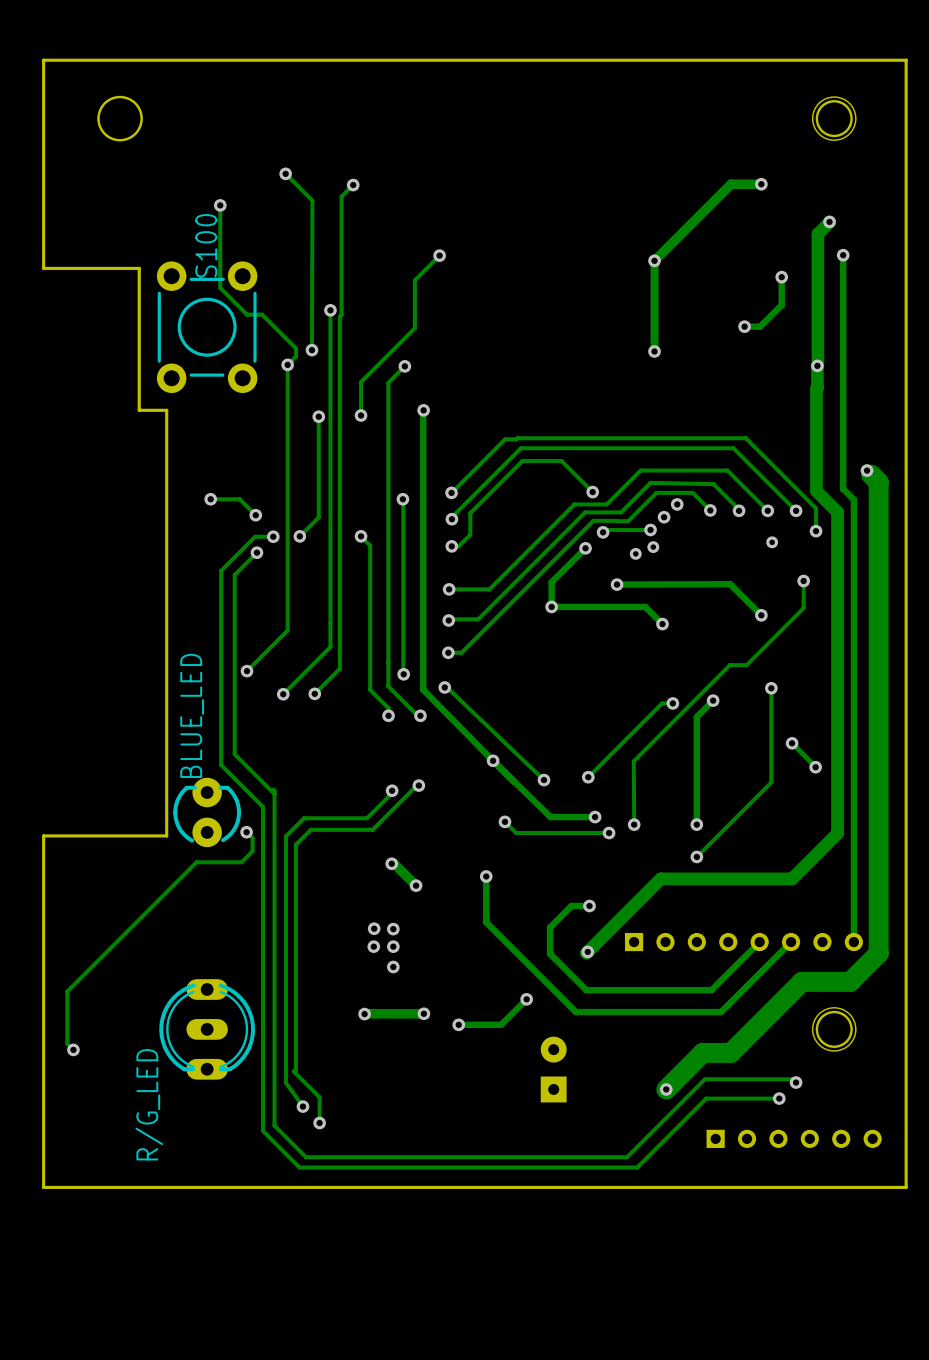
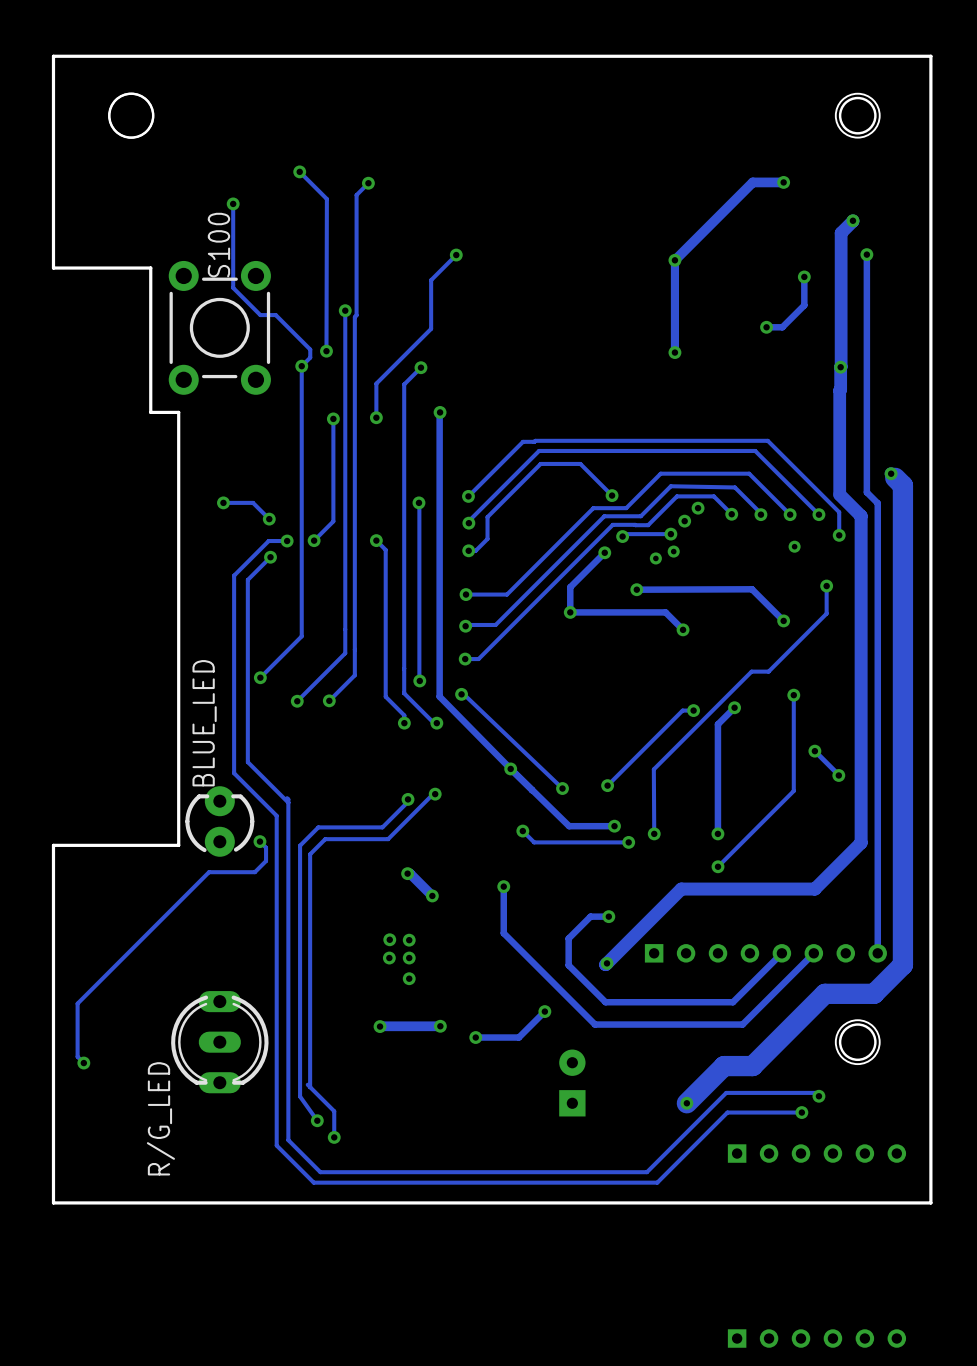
part: none -> (816, 1338)

